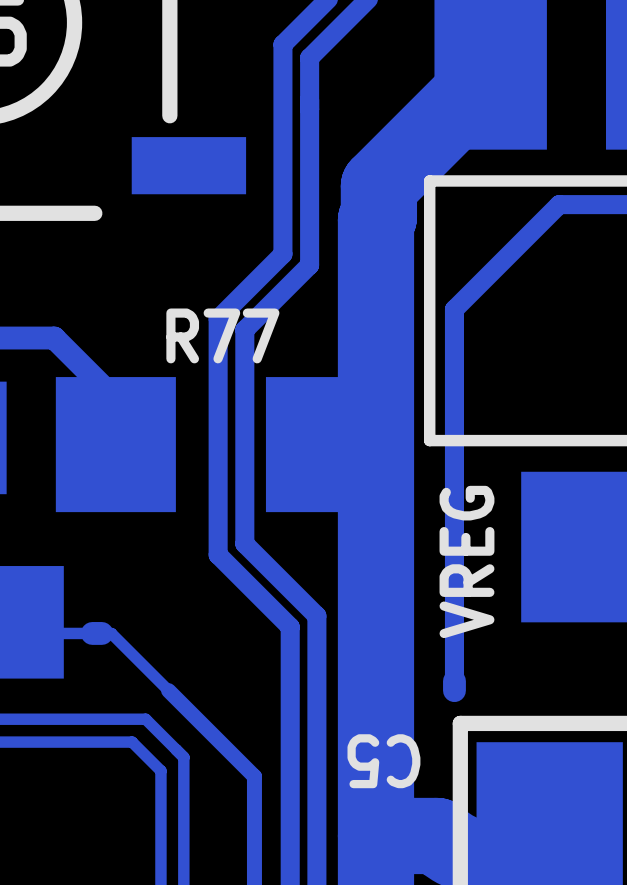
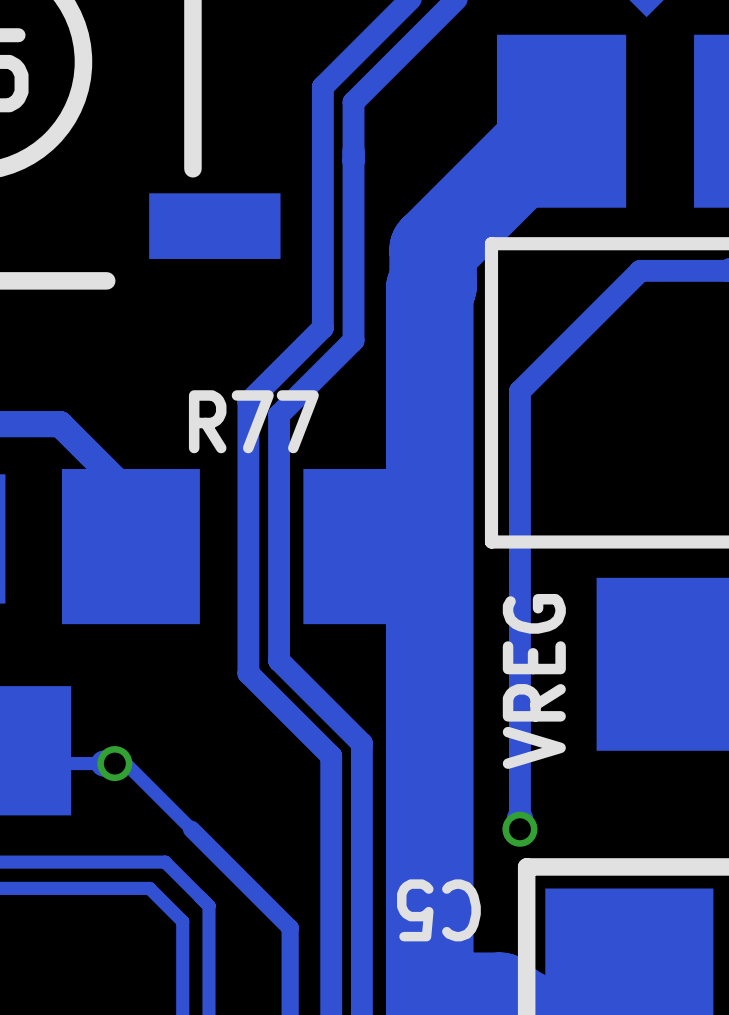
via: none -> (114, 763)
via: none -> (519, 829)

